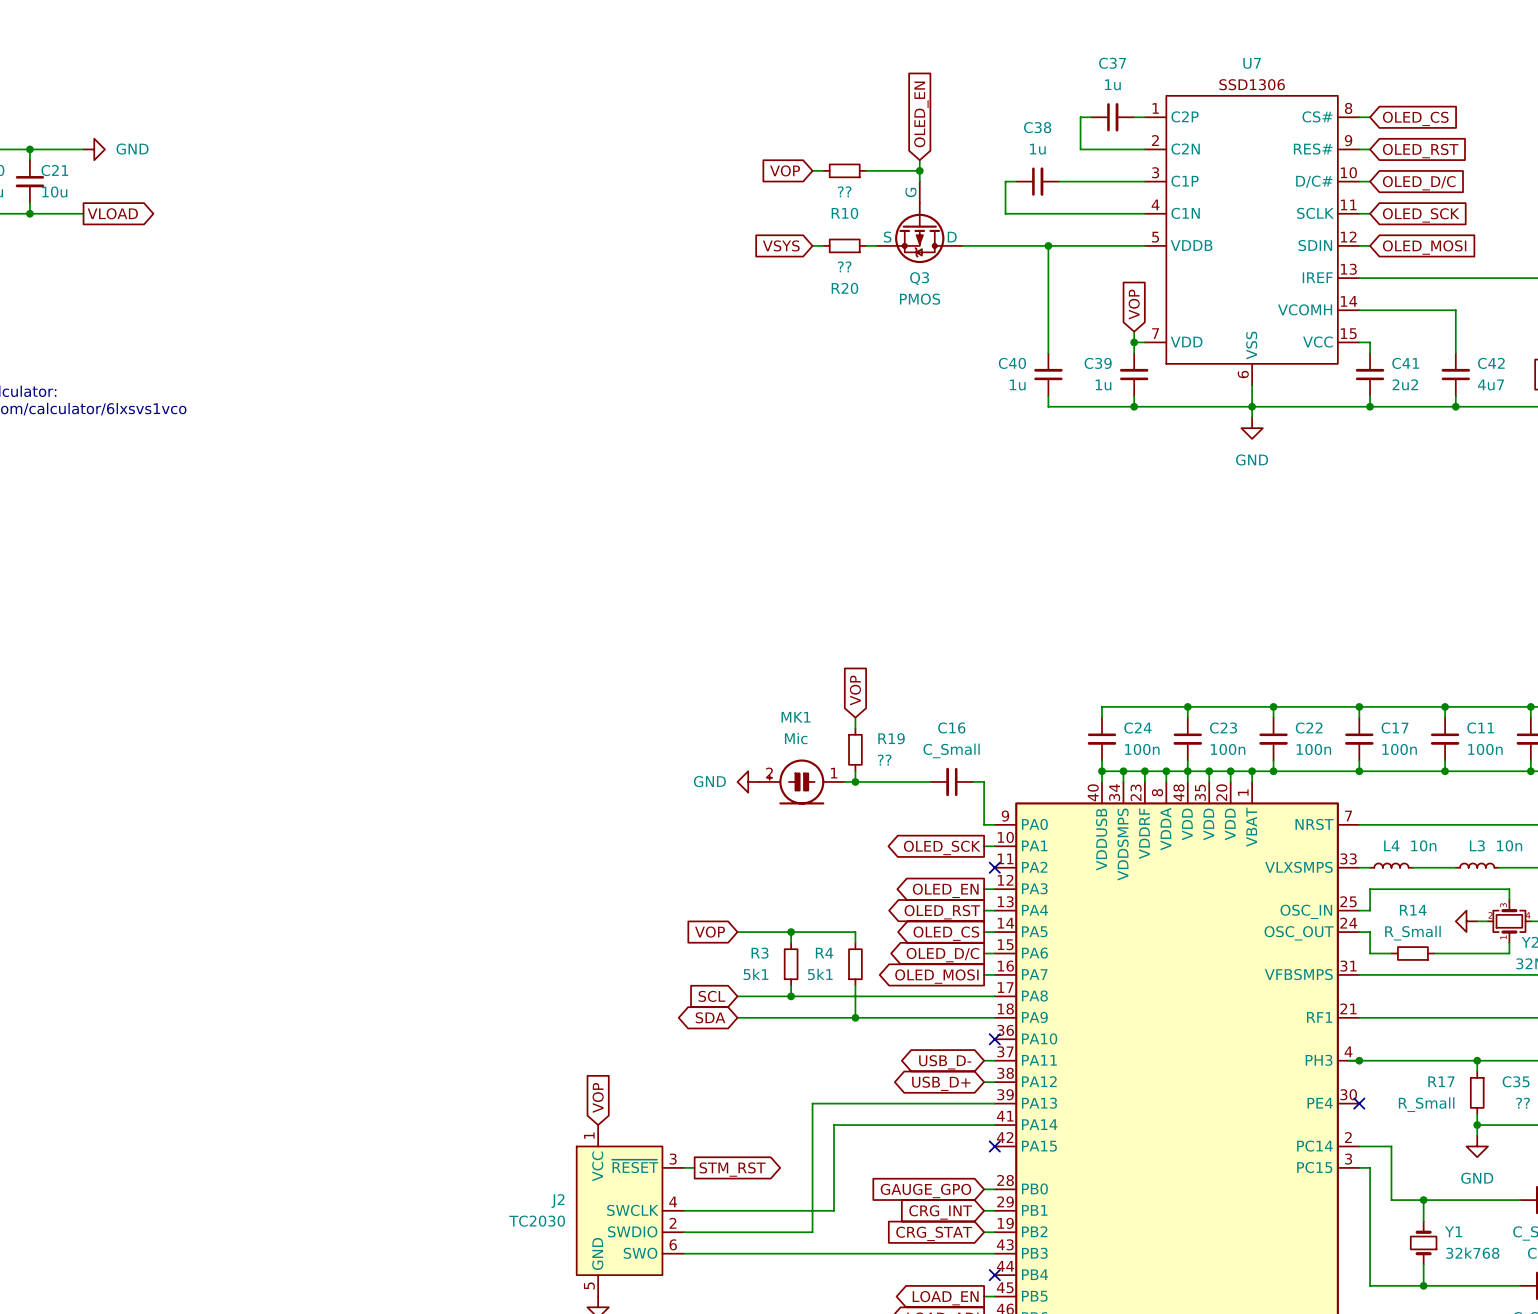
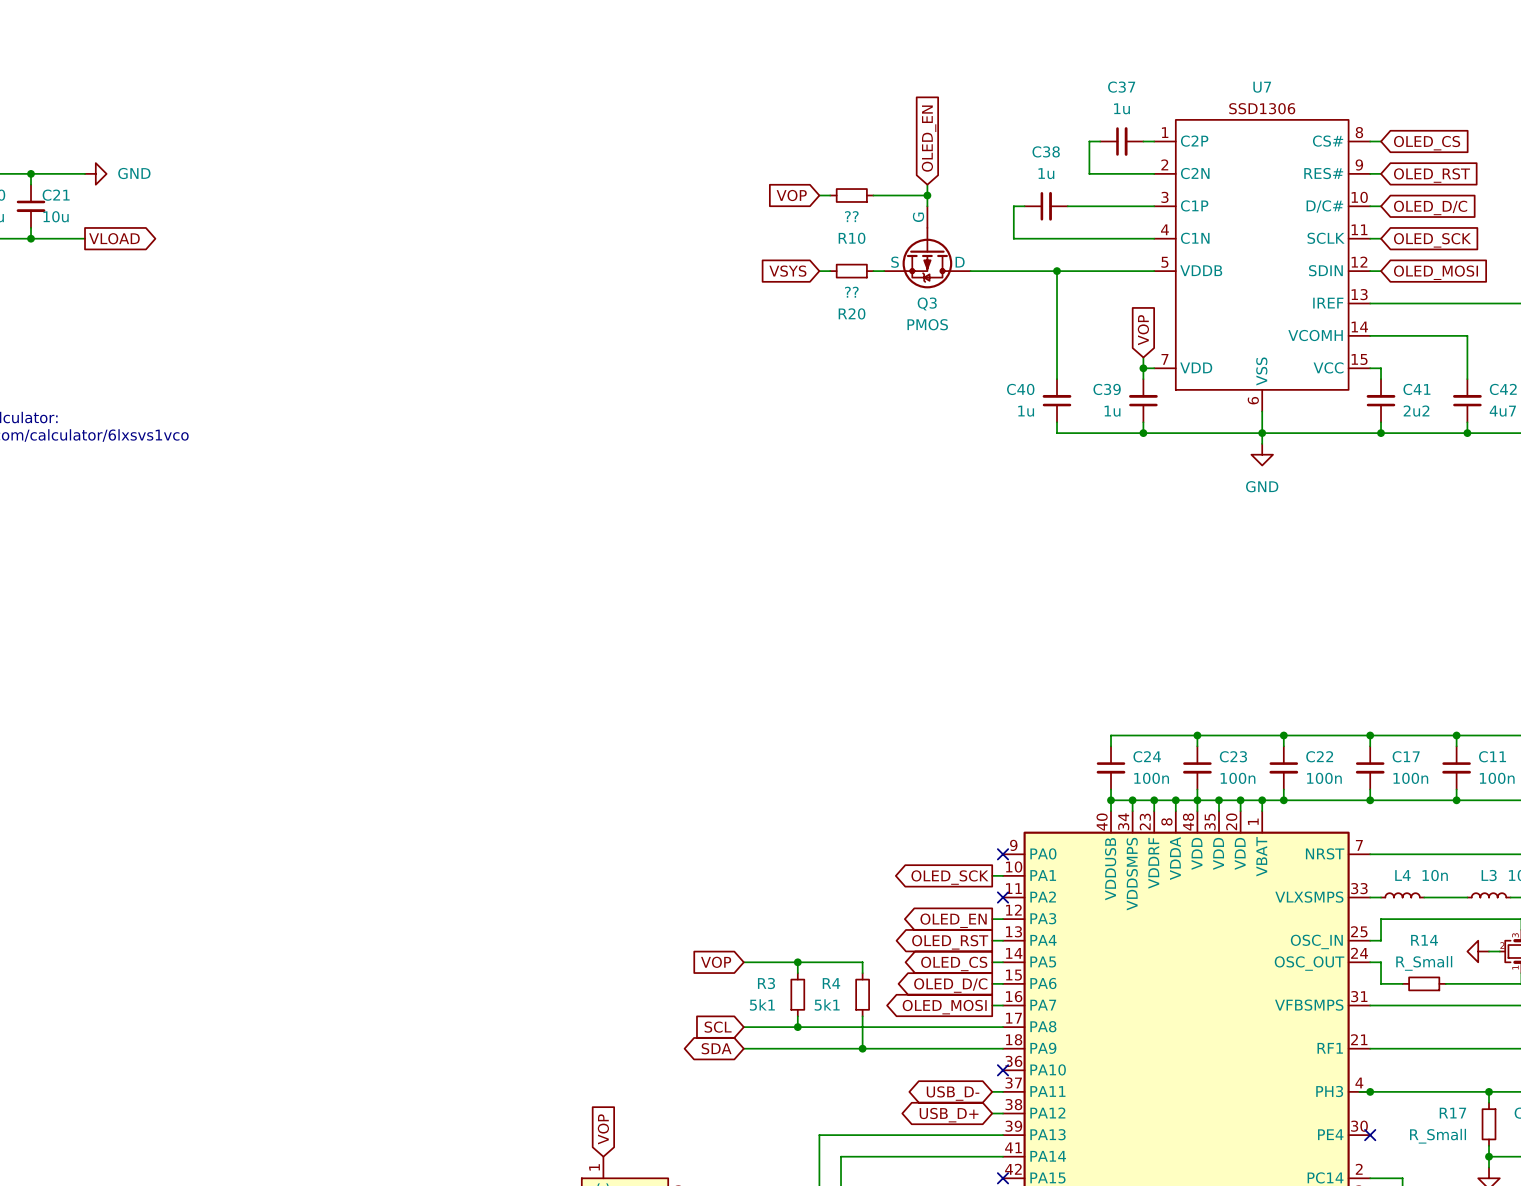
global label: VOP (855, 690) -> none
wire: (855, 717) (855, 728) -> none
R19: ?? (855, 749) -> none
wire: (855, 771) (855, 781) -> none
power symbol: GND (748, 781) -> none
MK1: Mic (801, 781) -> none
wire: (844, 781) (930, 781) -> none
junction: (855, 781) -> none
C16: C_Small (951, 781) -> none
wire: (973, 781) (984, 781) (984, 824) (994, 824) -> none
no-connect mark: none -> (1003, 854)

